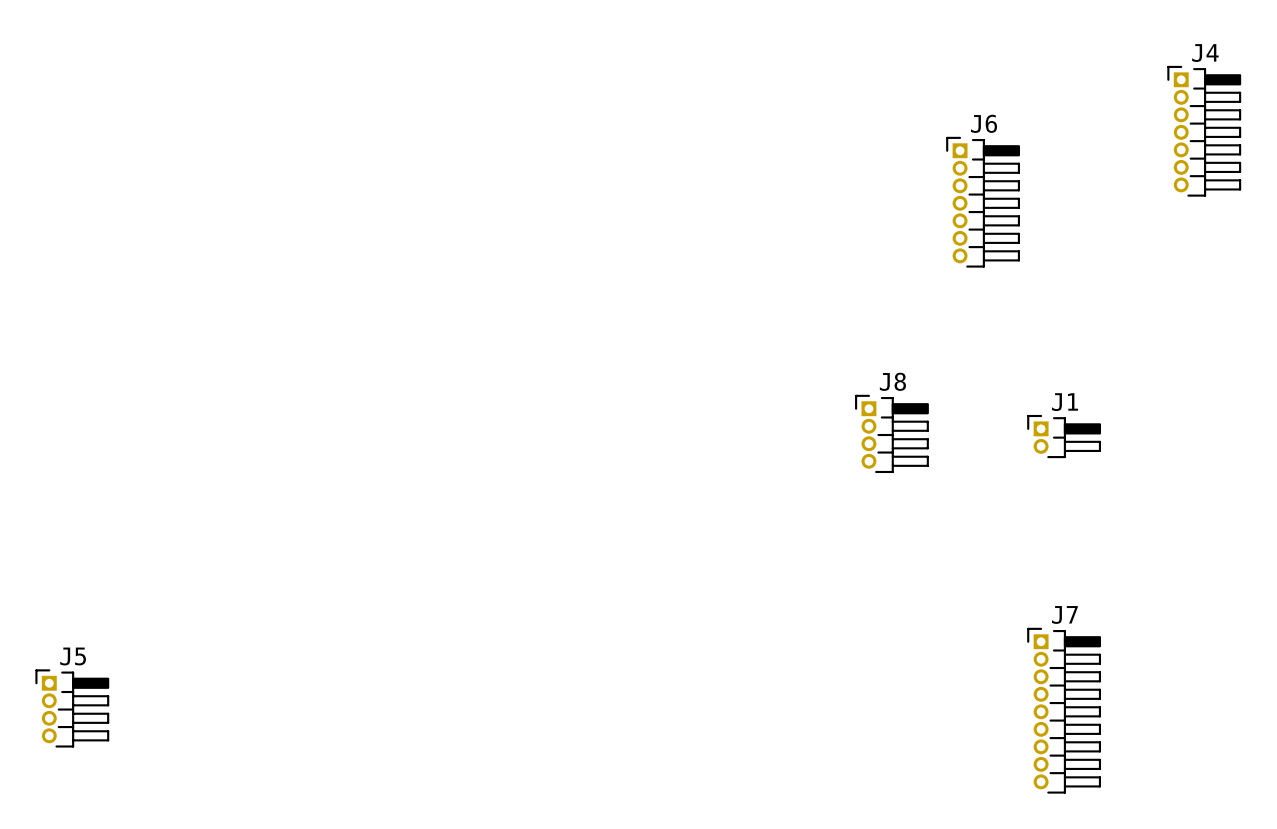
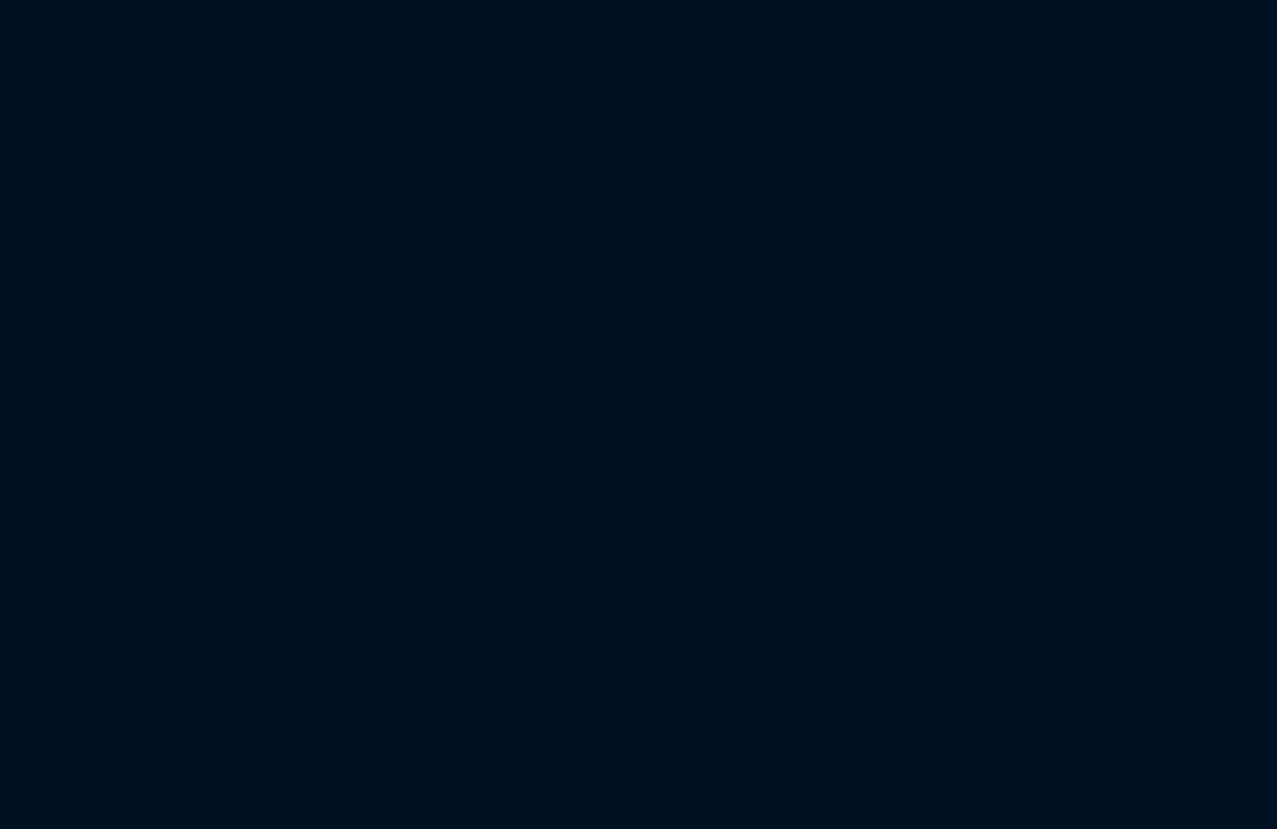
J4: (1204, 131) -> none
J6: (983, 202) -> none
J8: (891, 433) -> none
J1: (1064, 436) -> none
J5: (72, 708) -> none
J7: (1064, 710) -> none

